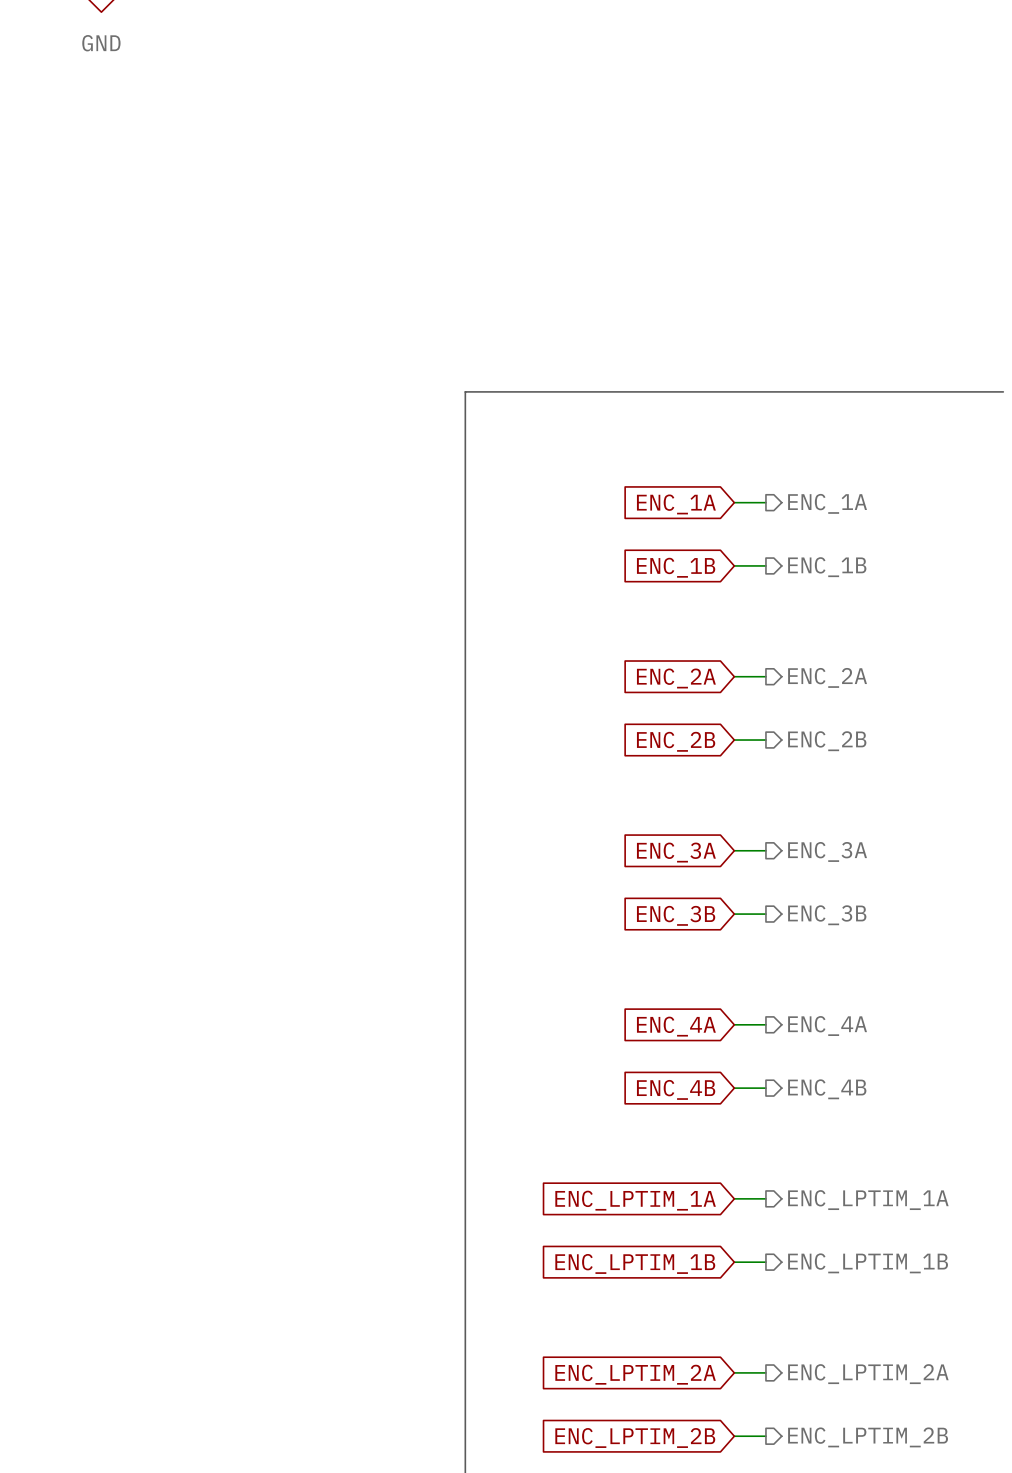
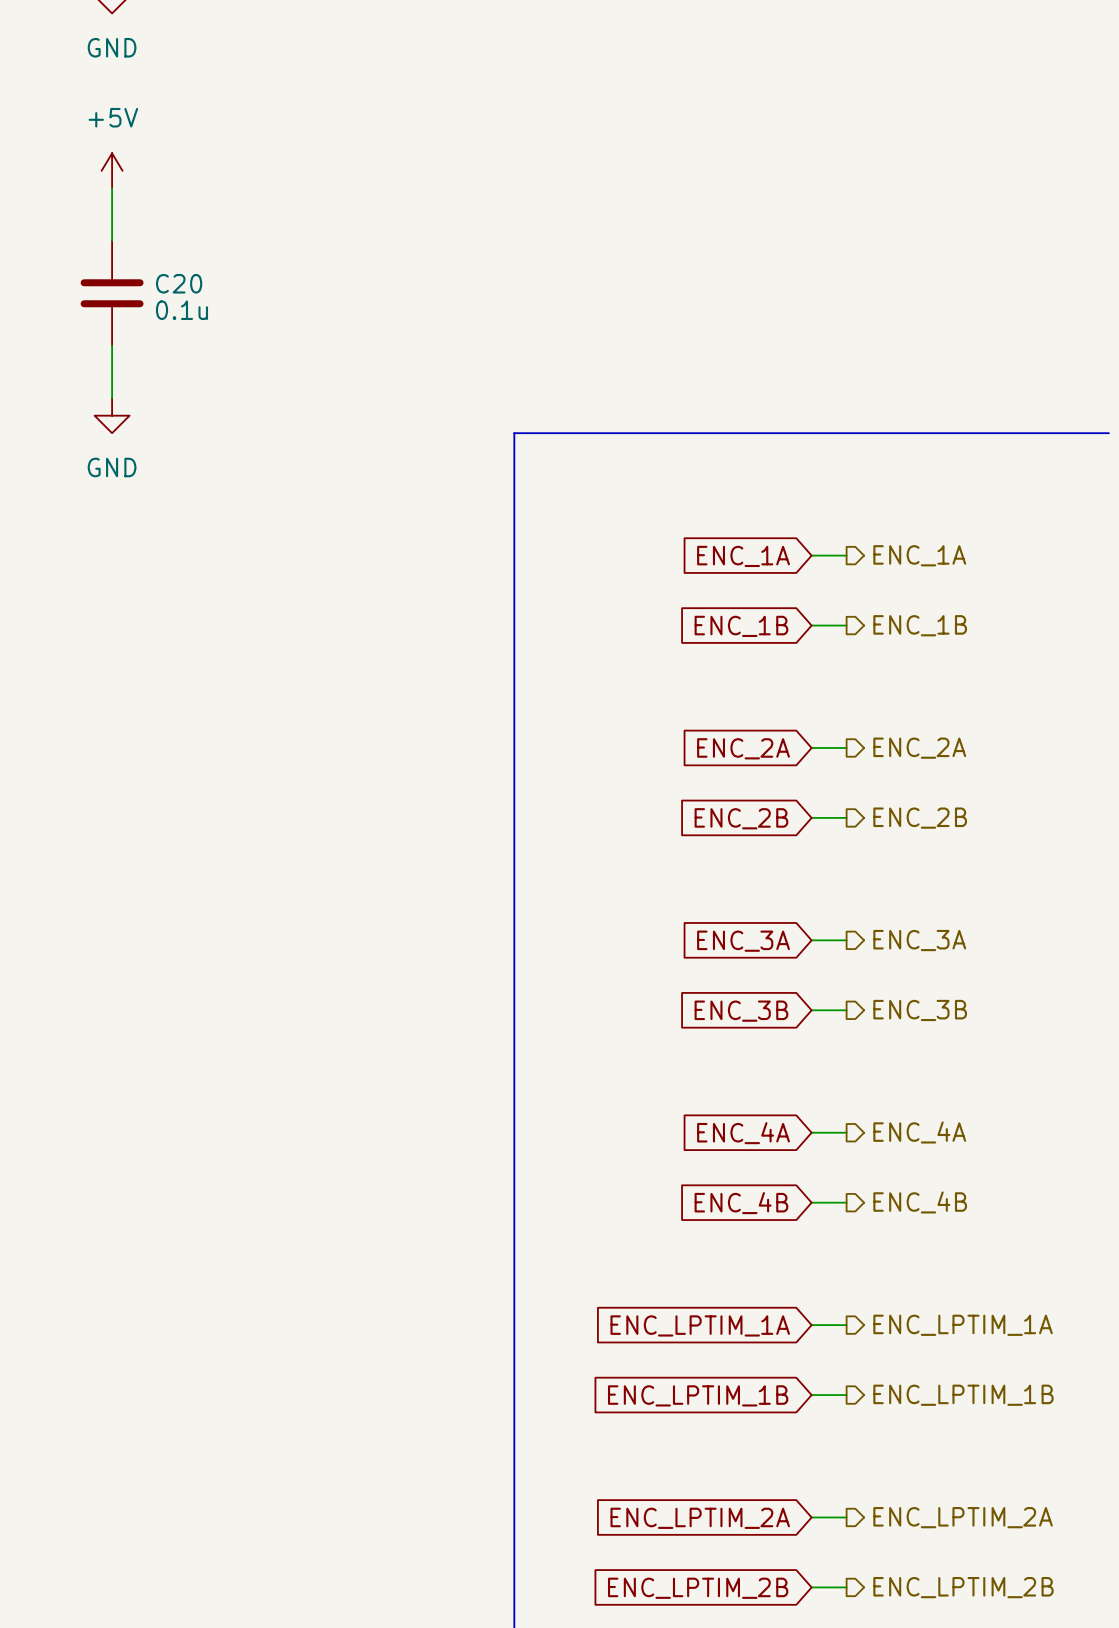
power symbol: none -> +5V (112, 170)
wire: none -> (112, 188) (112, 240)
C20: none -> 0.1u (112, 293)
wire: none -> (112, 345) (112, 398)
power symbol: none -> GND (112, 415)

